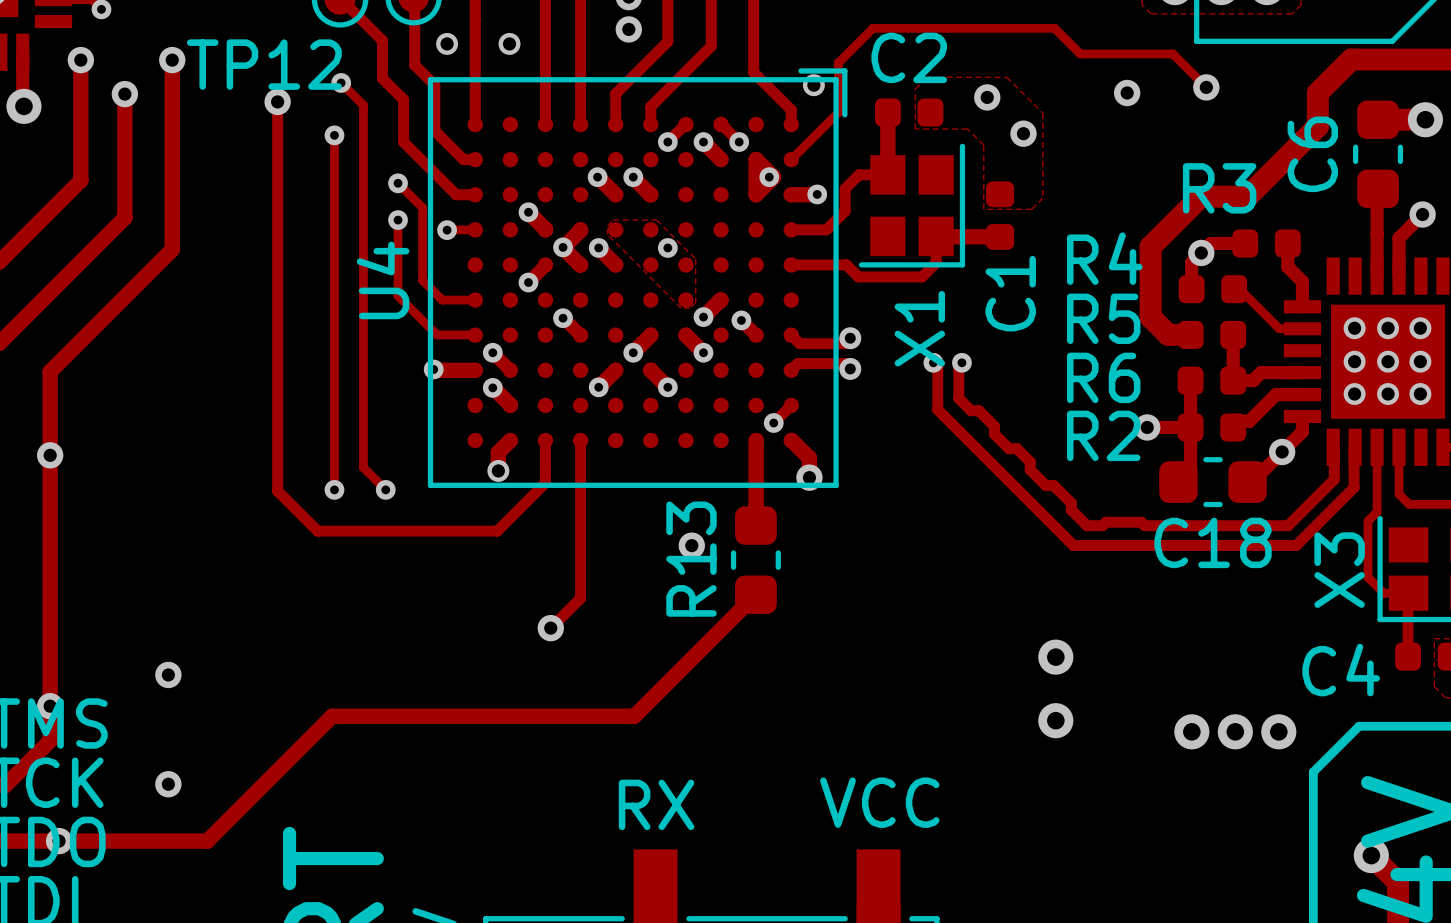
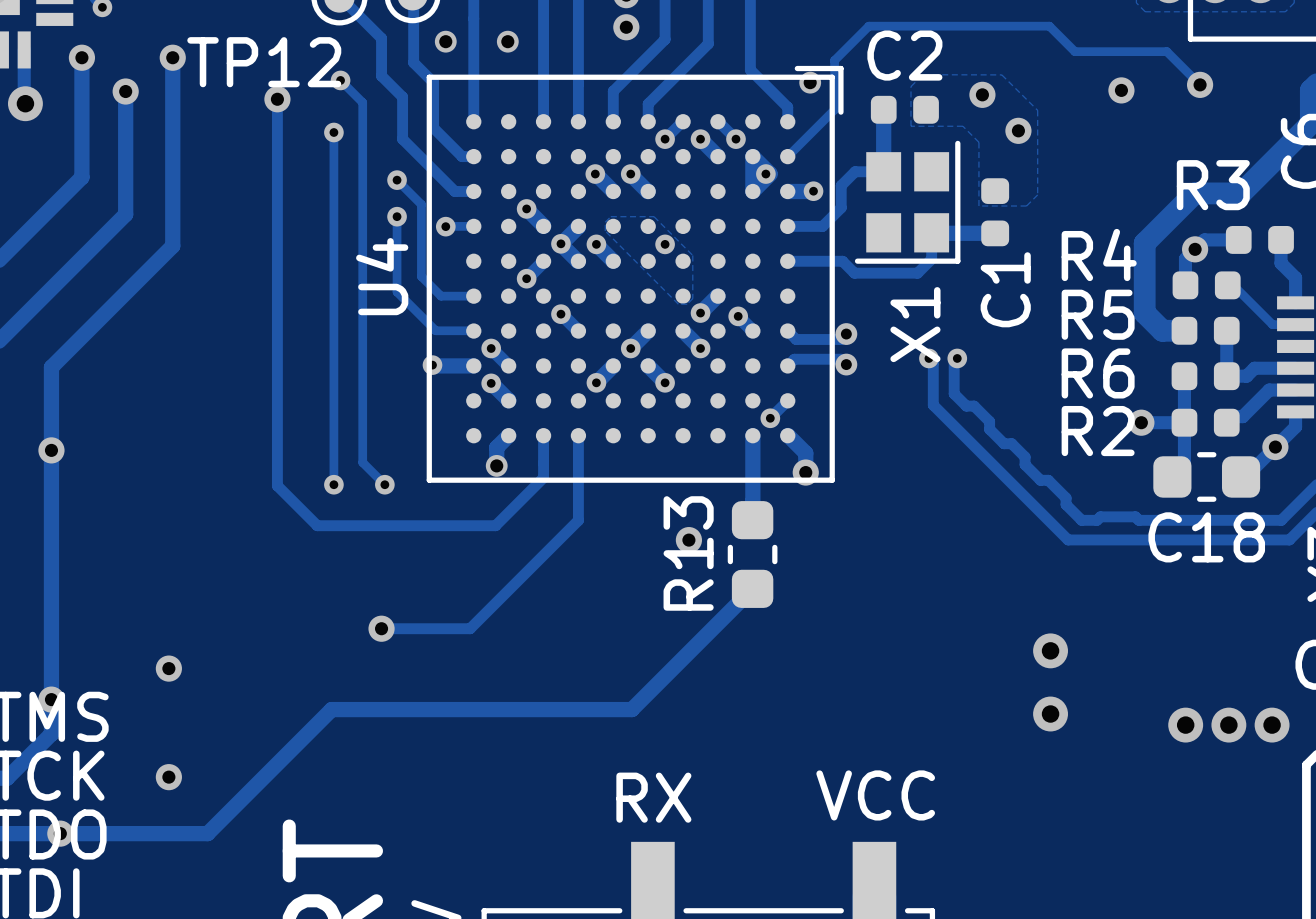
track: (580, 525) (580, 598) (550, 628) -> (578, 520) (470, 628) (381, 628)
via position: (550, 628) -> (381, 628)

